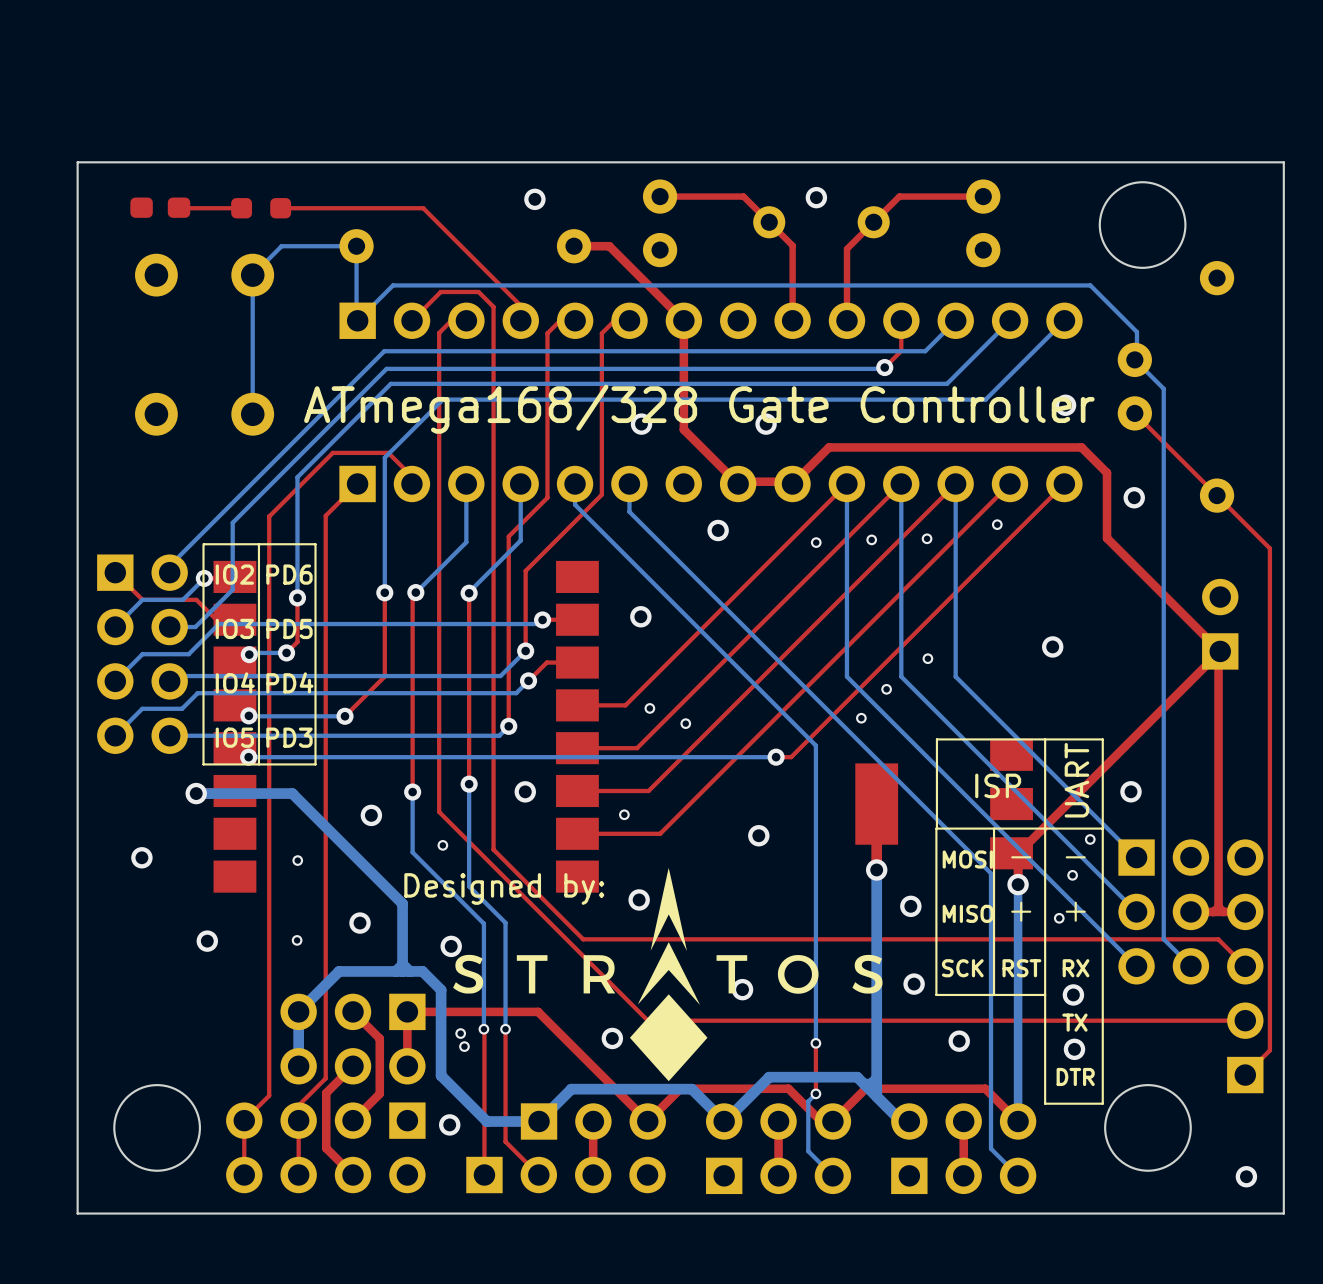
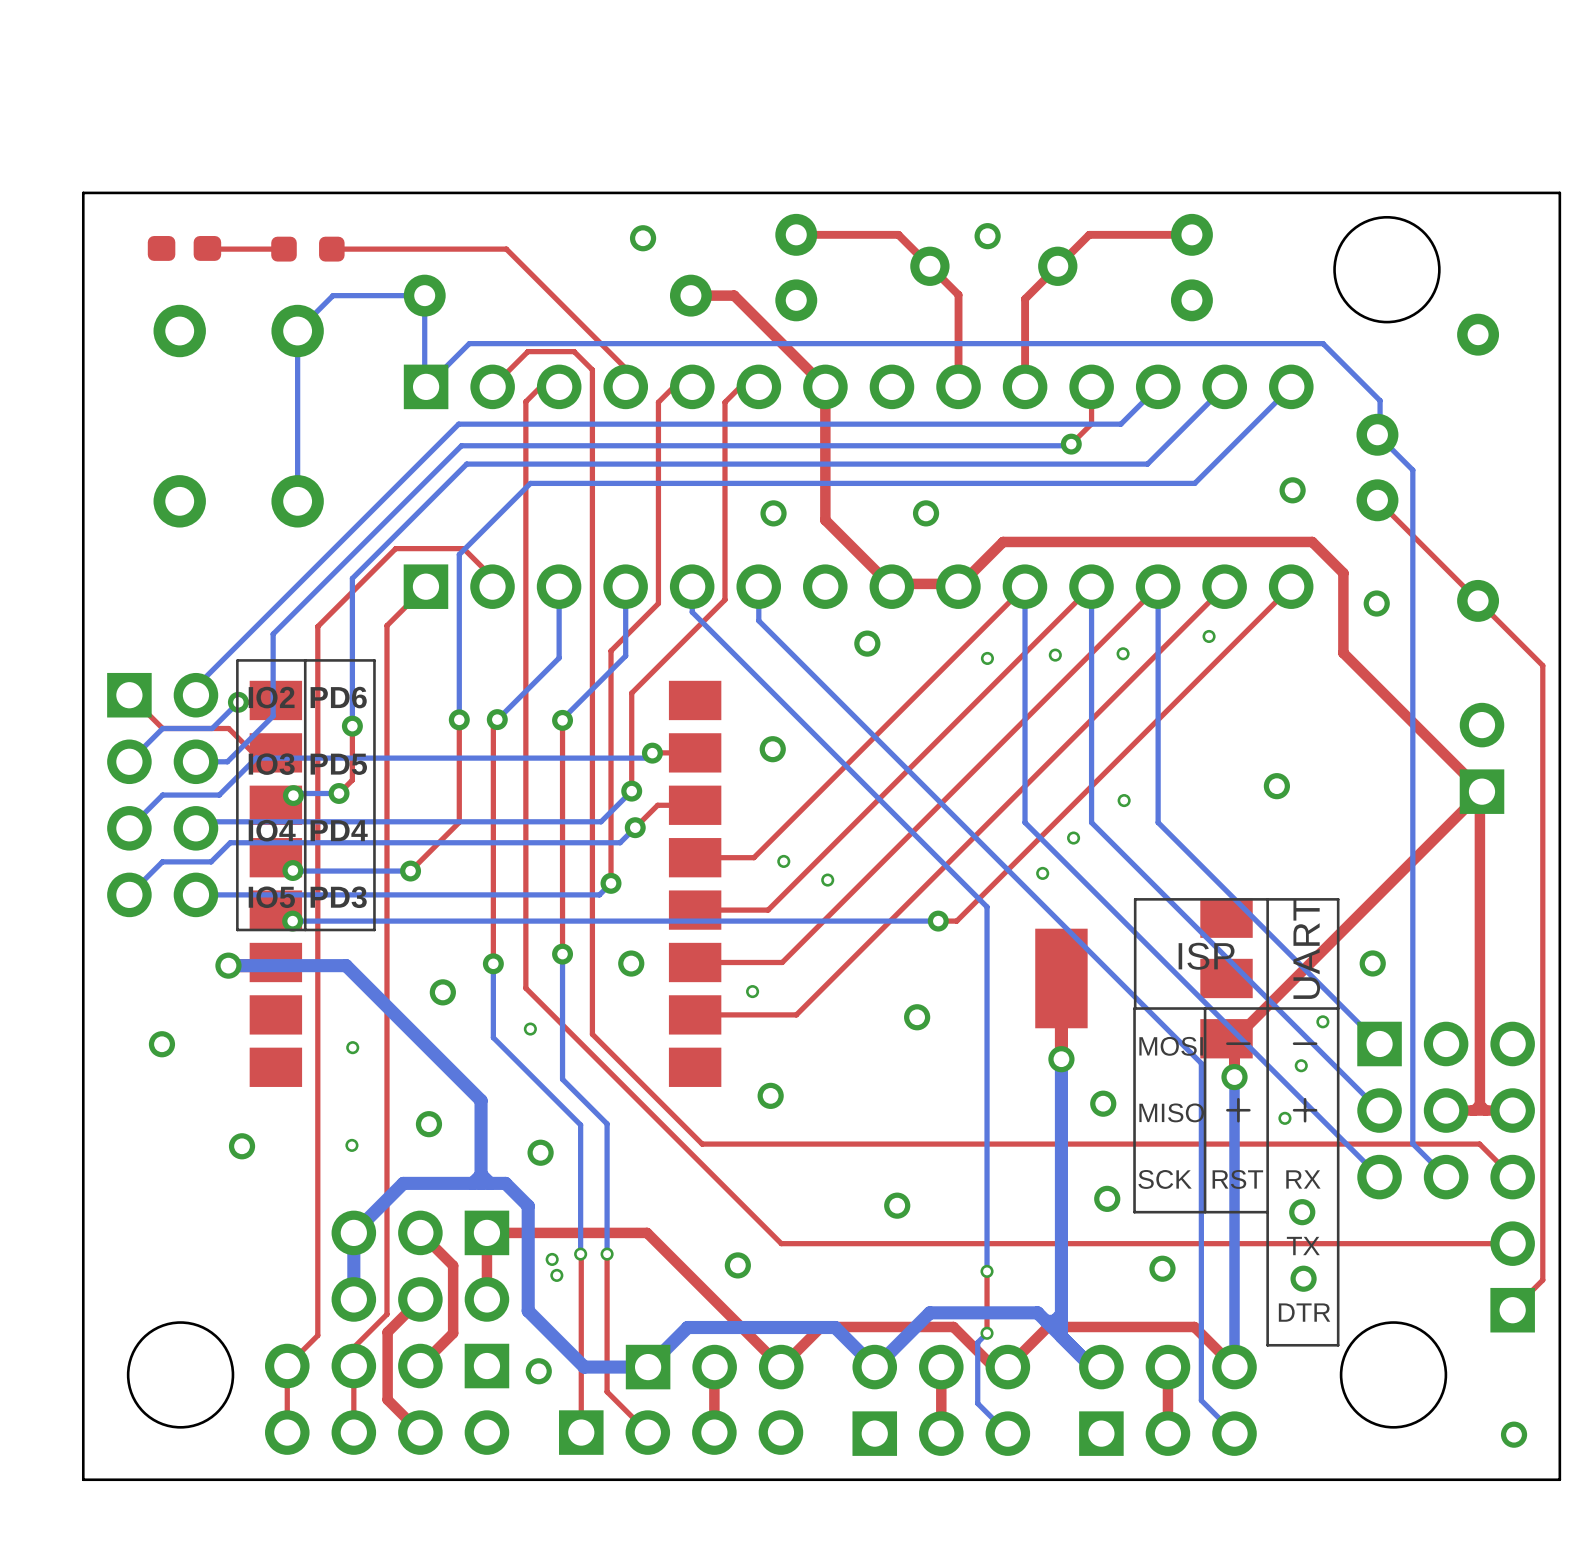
text: ATmega168/328 Gate Controller (699, 409) -> none
drawing: [453, 868, 883, 1082] -> none
text: Designed by: (504, 888) -> none

